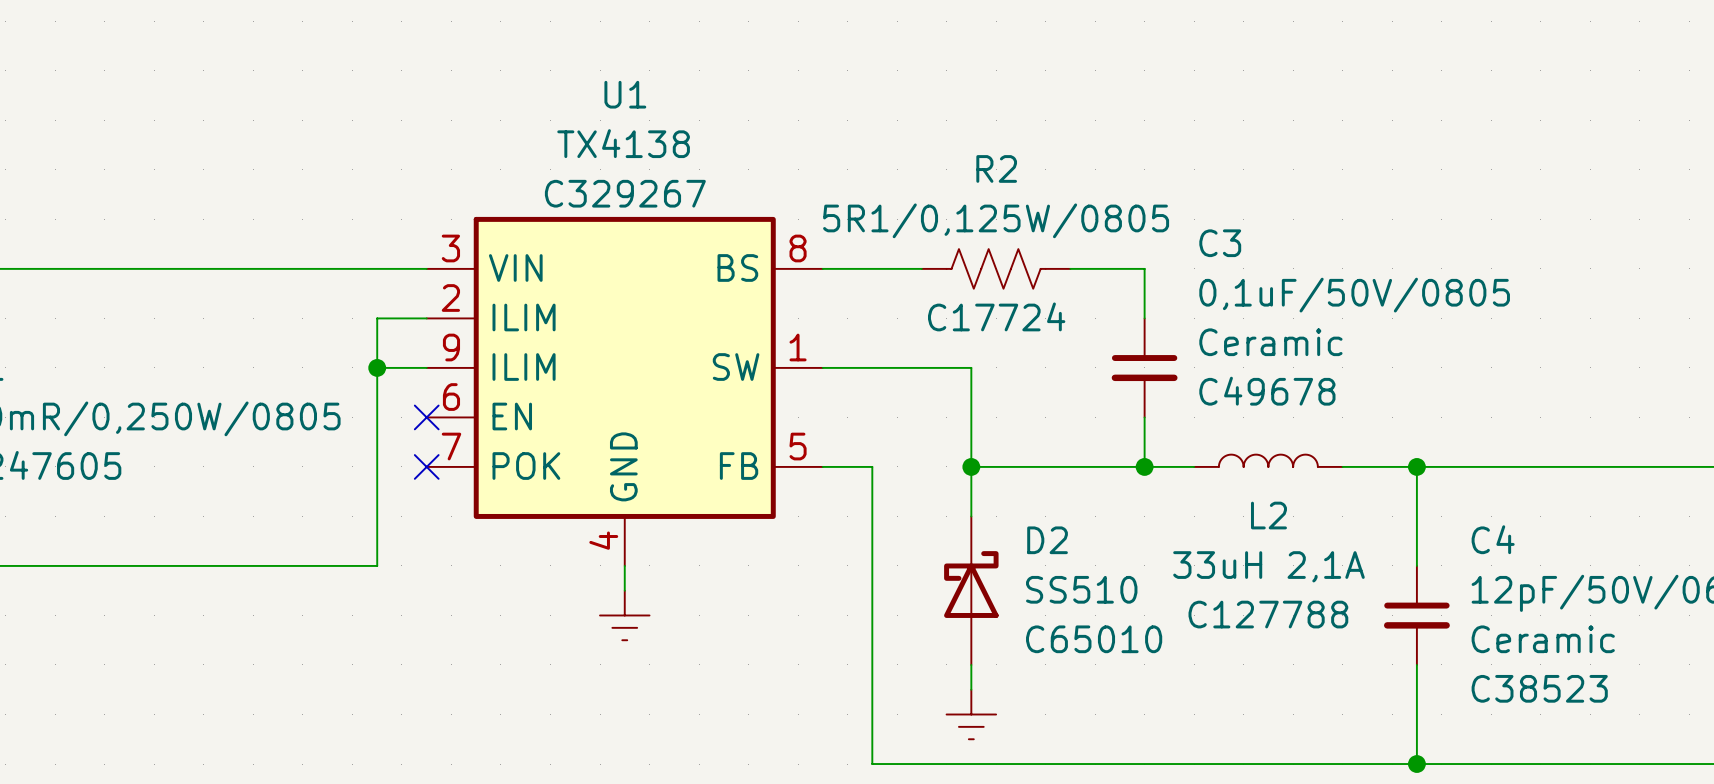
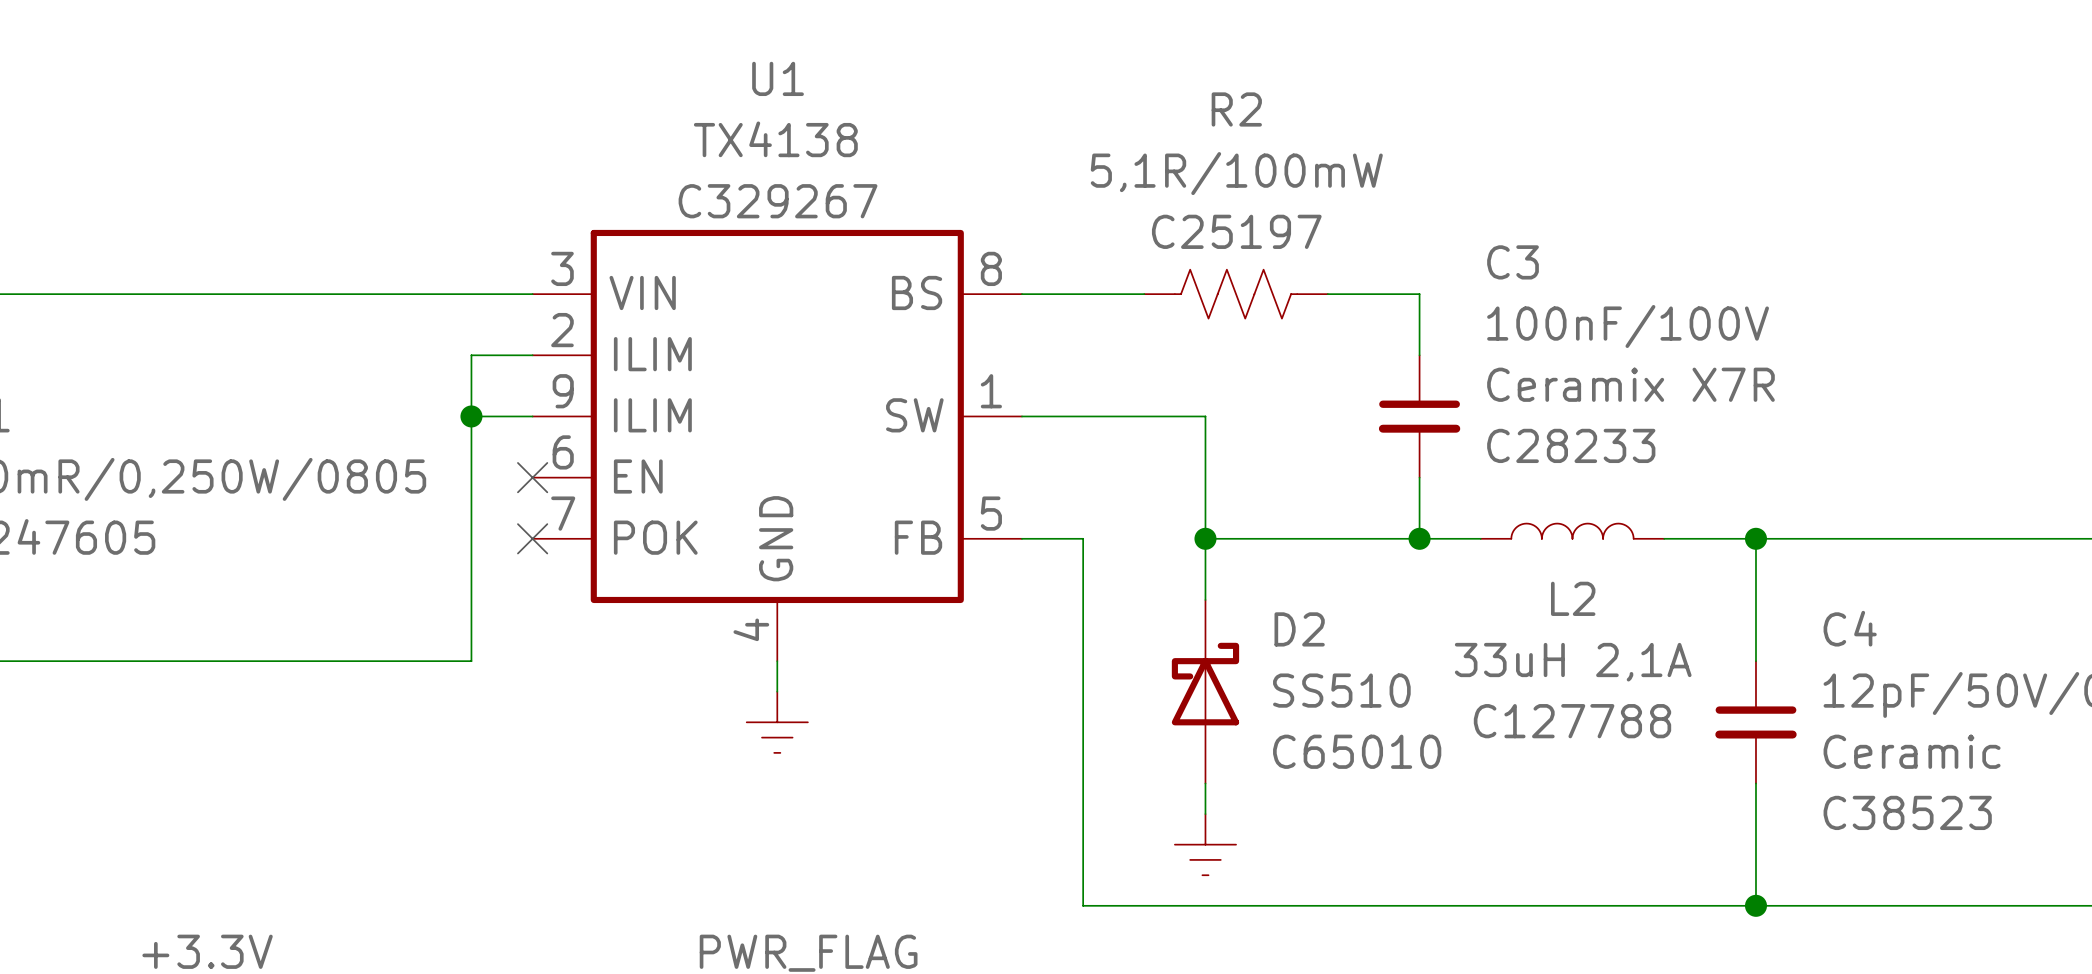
R2 name position: R2 (996, 168) -> R2 (1236, 109)
R2 value: 5R1/0,125W/0805 (996, 220) -> 5,1R/100mW (1236, 173)
C3 value: 0,1uF/50V/0805 (1354, 295) -> 100nF/100V (1628, 326)
R2 text: C17724 (996, 316) -> C25197 (1236, 231)
C3 text: Ceramic (1270, 342) -> Ceramix X7R (1630, 384)
C3 text: C49678 (1267, 391) -> C28233 (1571, 445)

